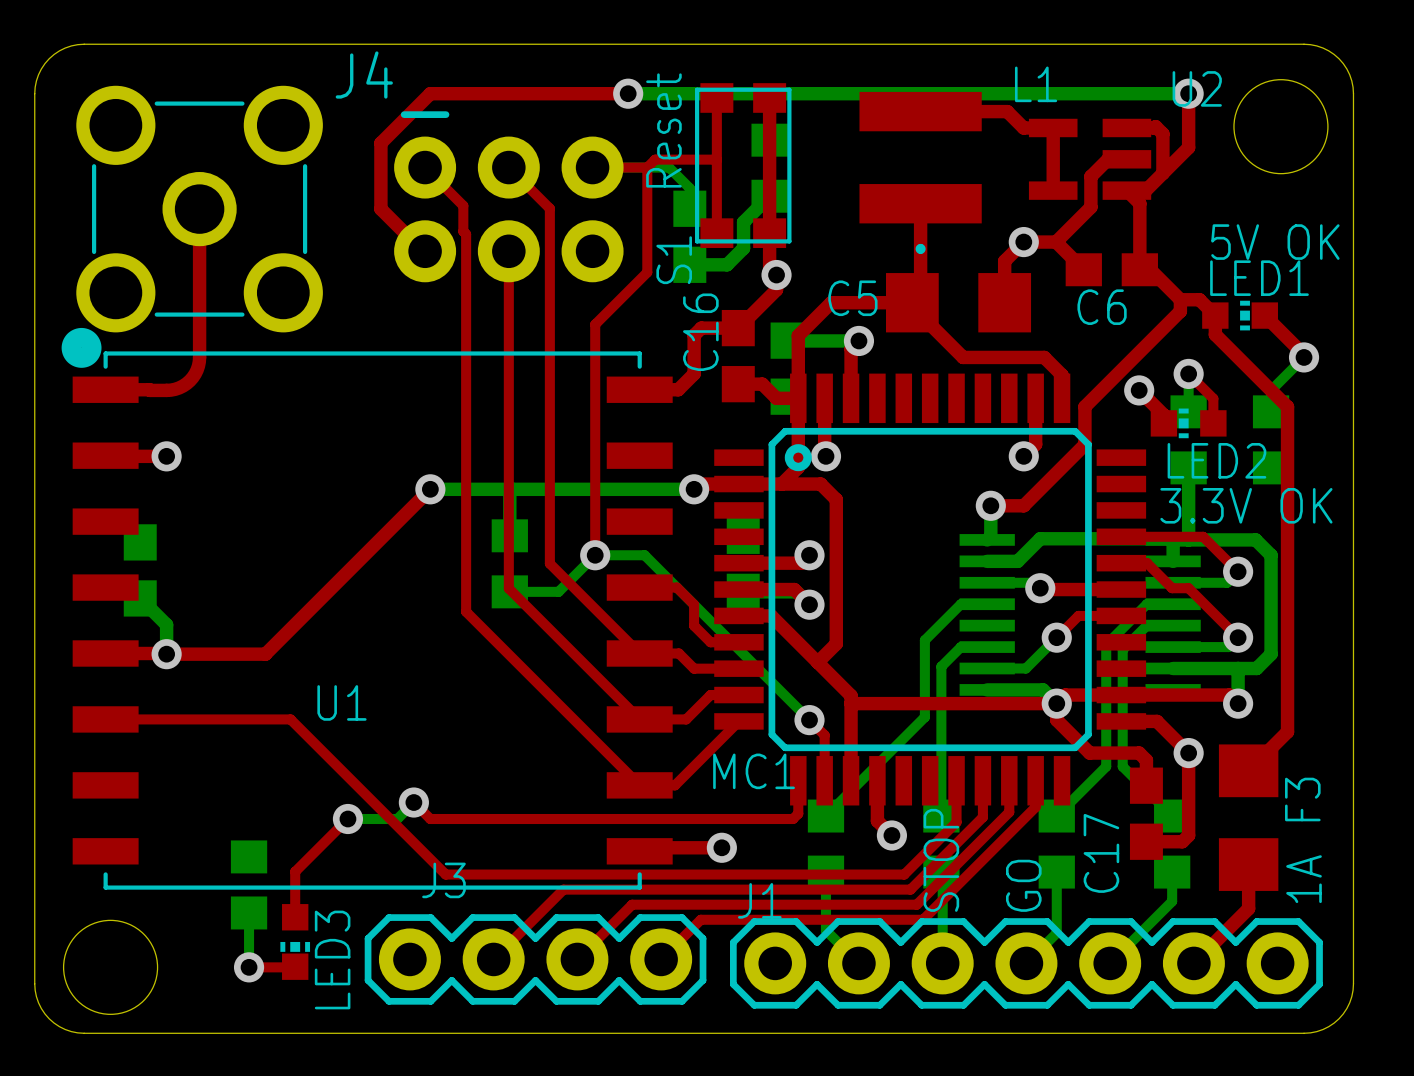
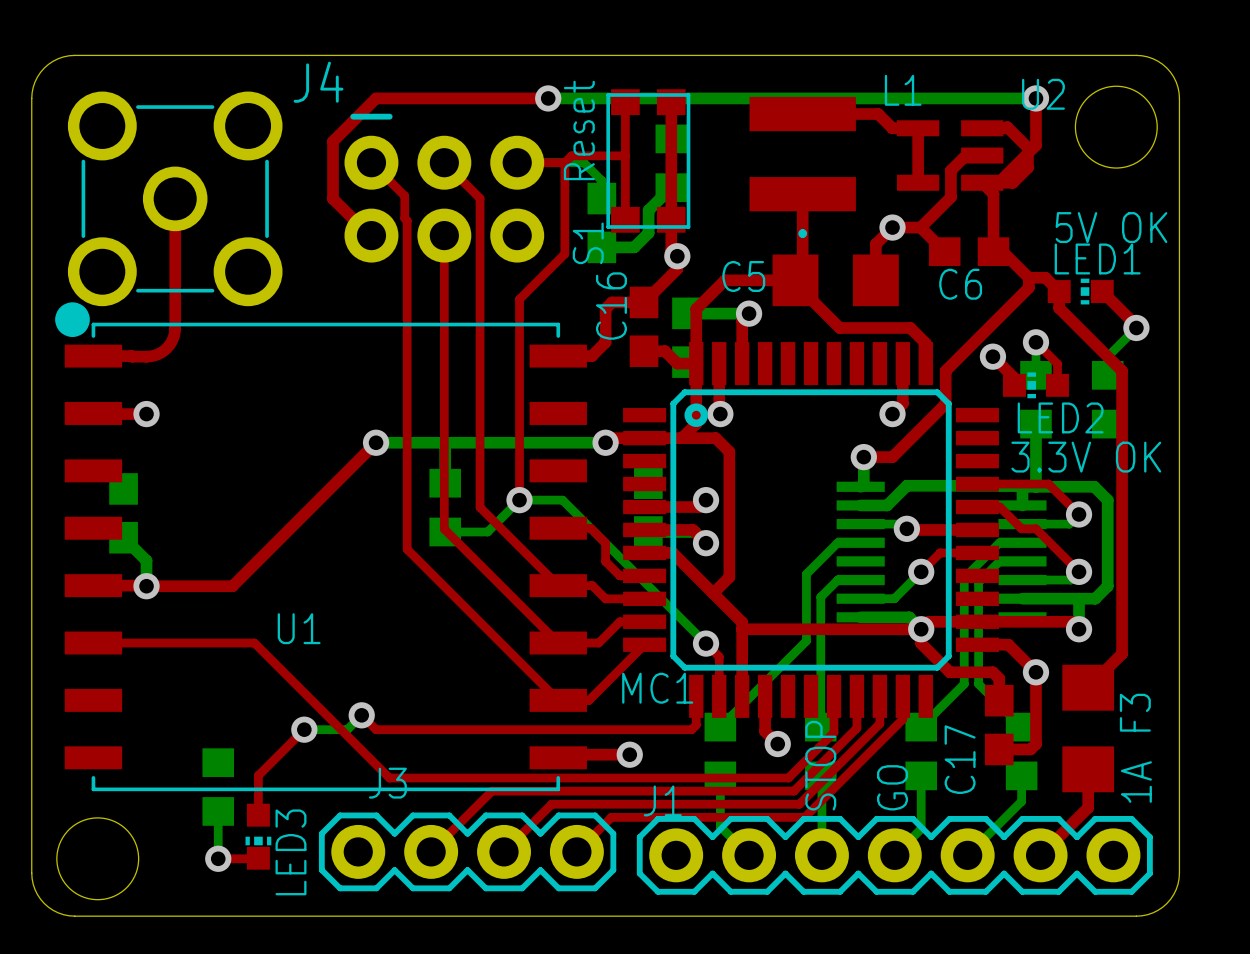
top track: (1162, 133) (1162, 173) -> (1013, 133) (1027, 147) (1027, 167) (1012, 182) (998, 182)

